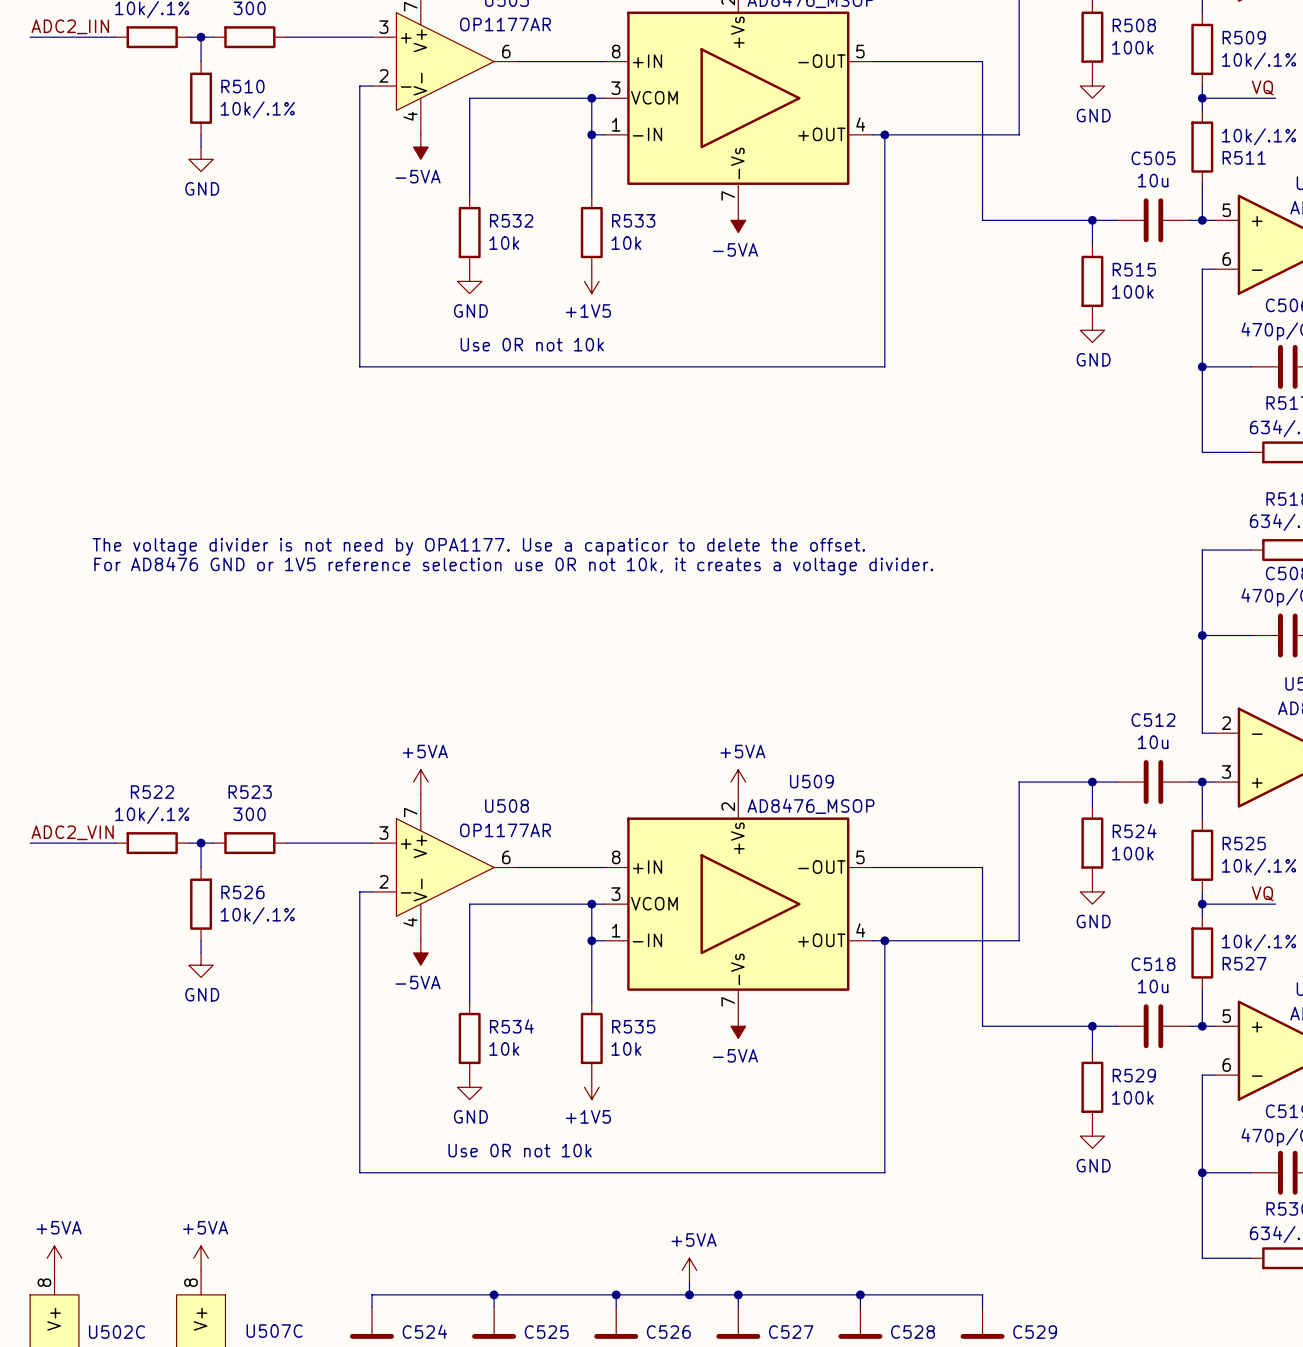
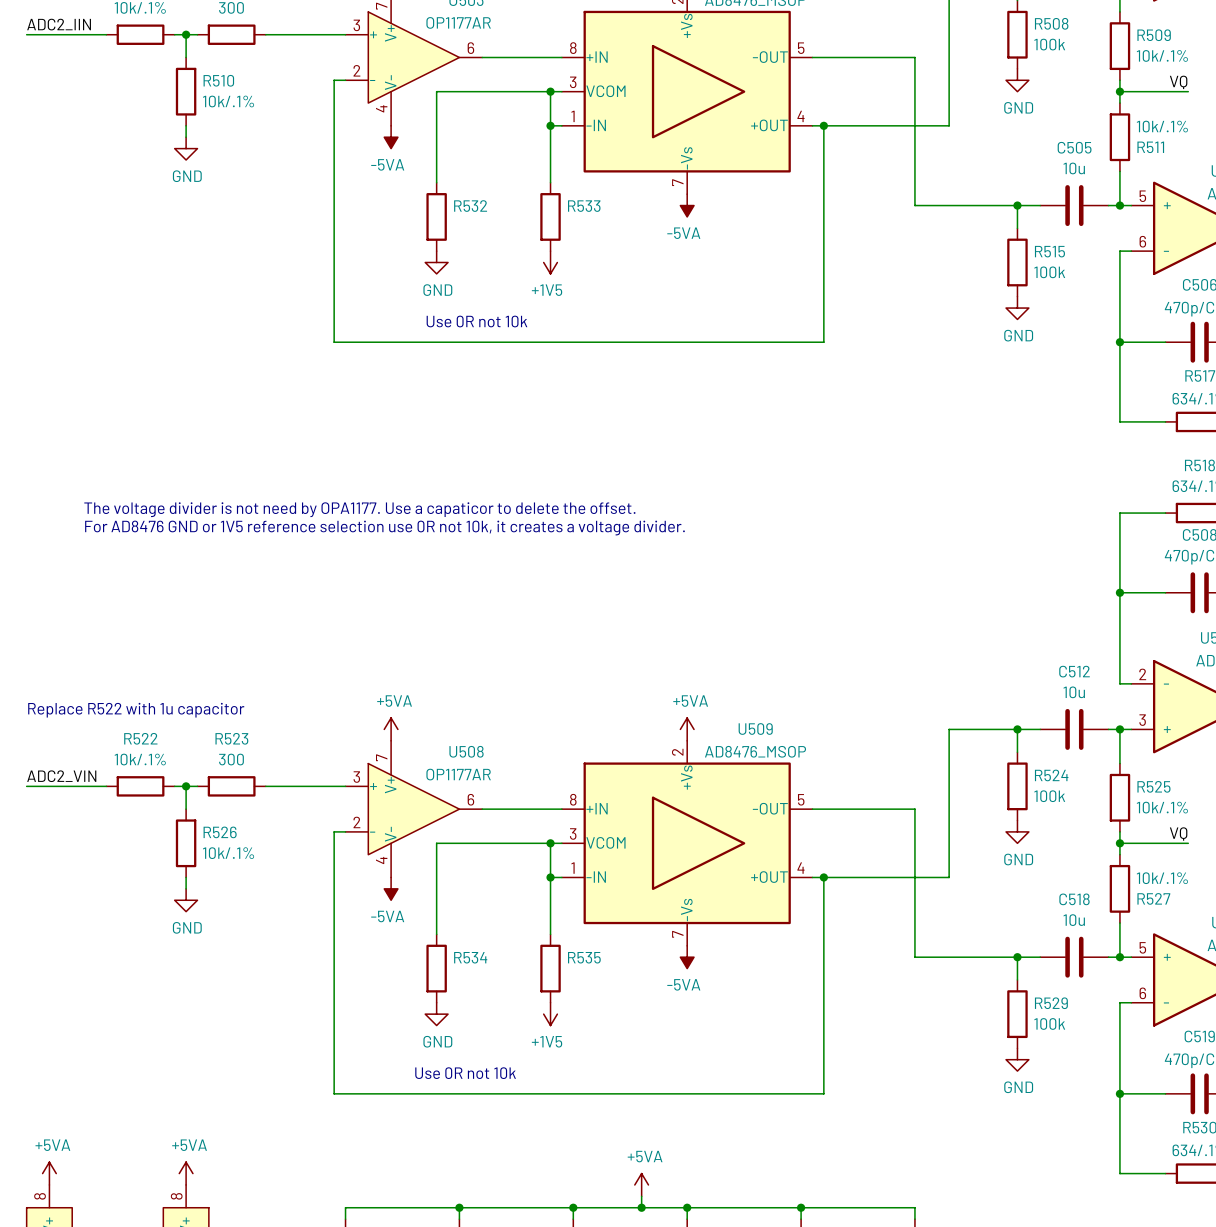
R532 value: 10k (504, 243) -> none
R533 value: 10k (626, 243) -> none
text: none -> Replace R522 with 1u capacitor (136, 710)
R534 value: 10k (504, 1048) -> none
R535 value: 10k (626, 1048) -> none

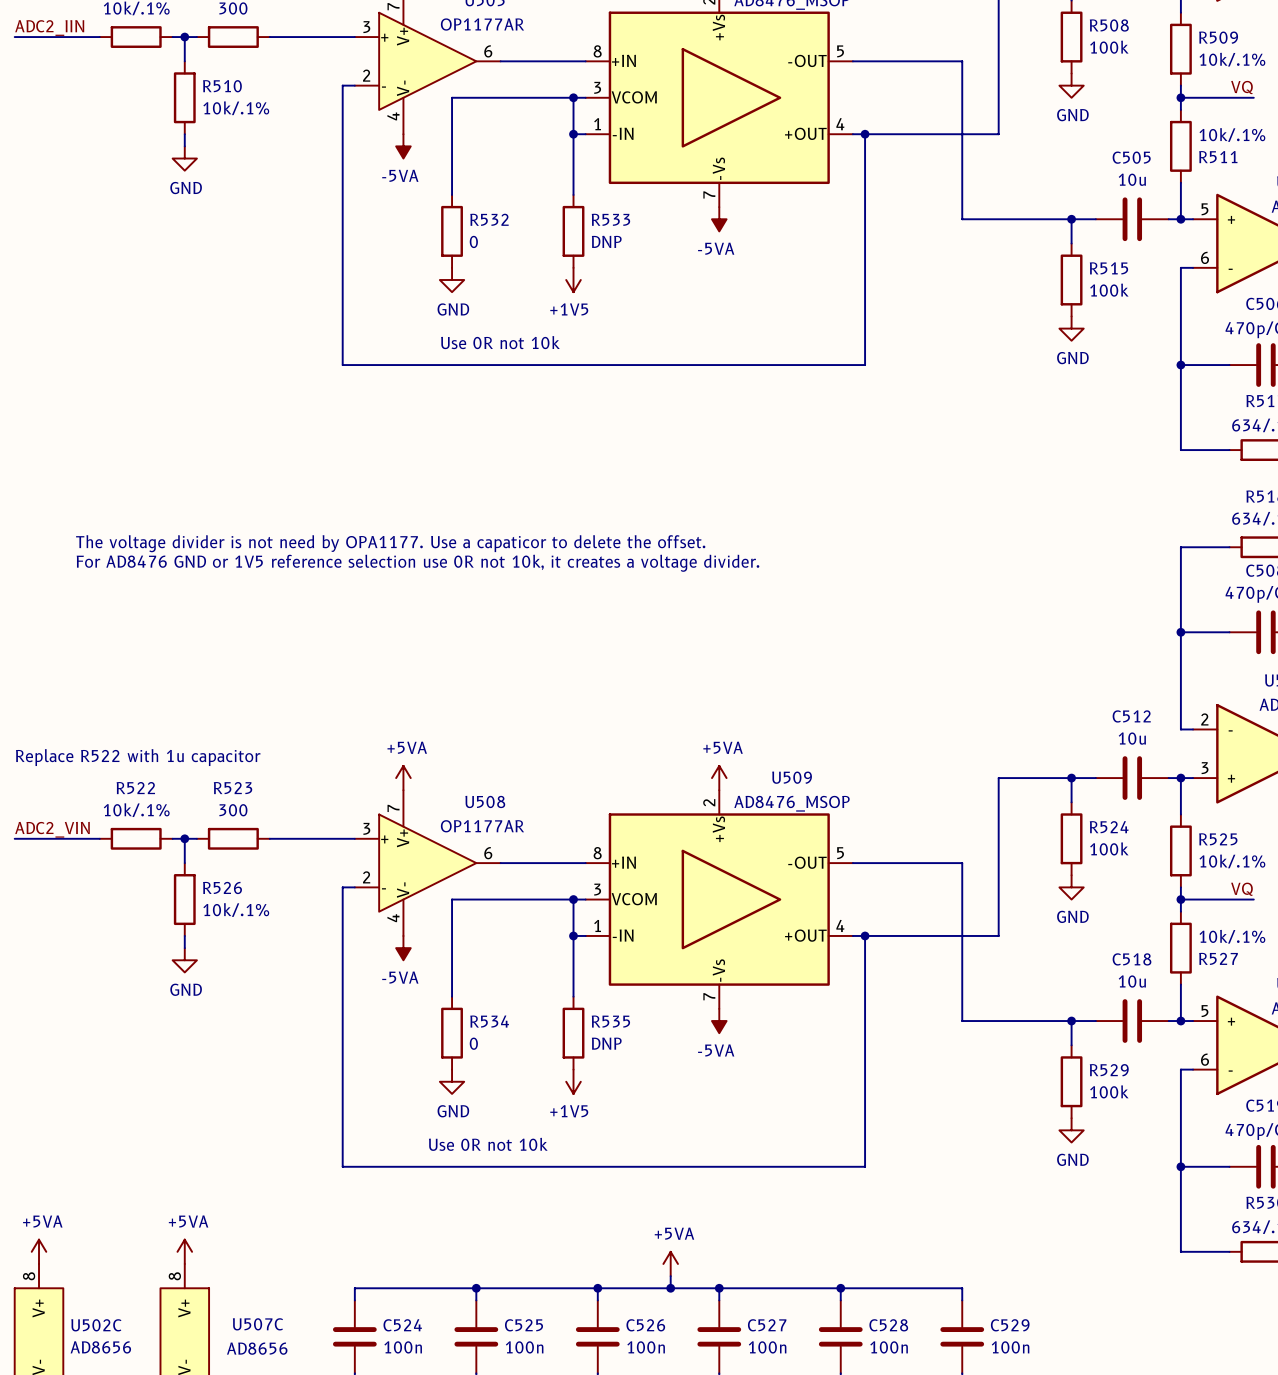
R532 value: none -> 0 (473, 241)
R533 value: none -> DNP (606, 241)
R534 value: none -> 0 (473, 1043)
R535 value: none -> DNP (606, 1043)

